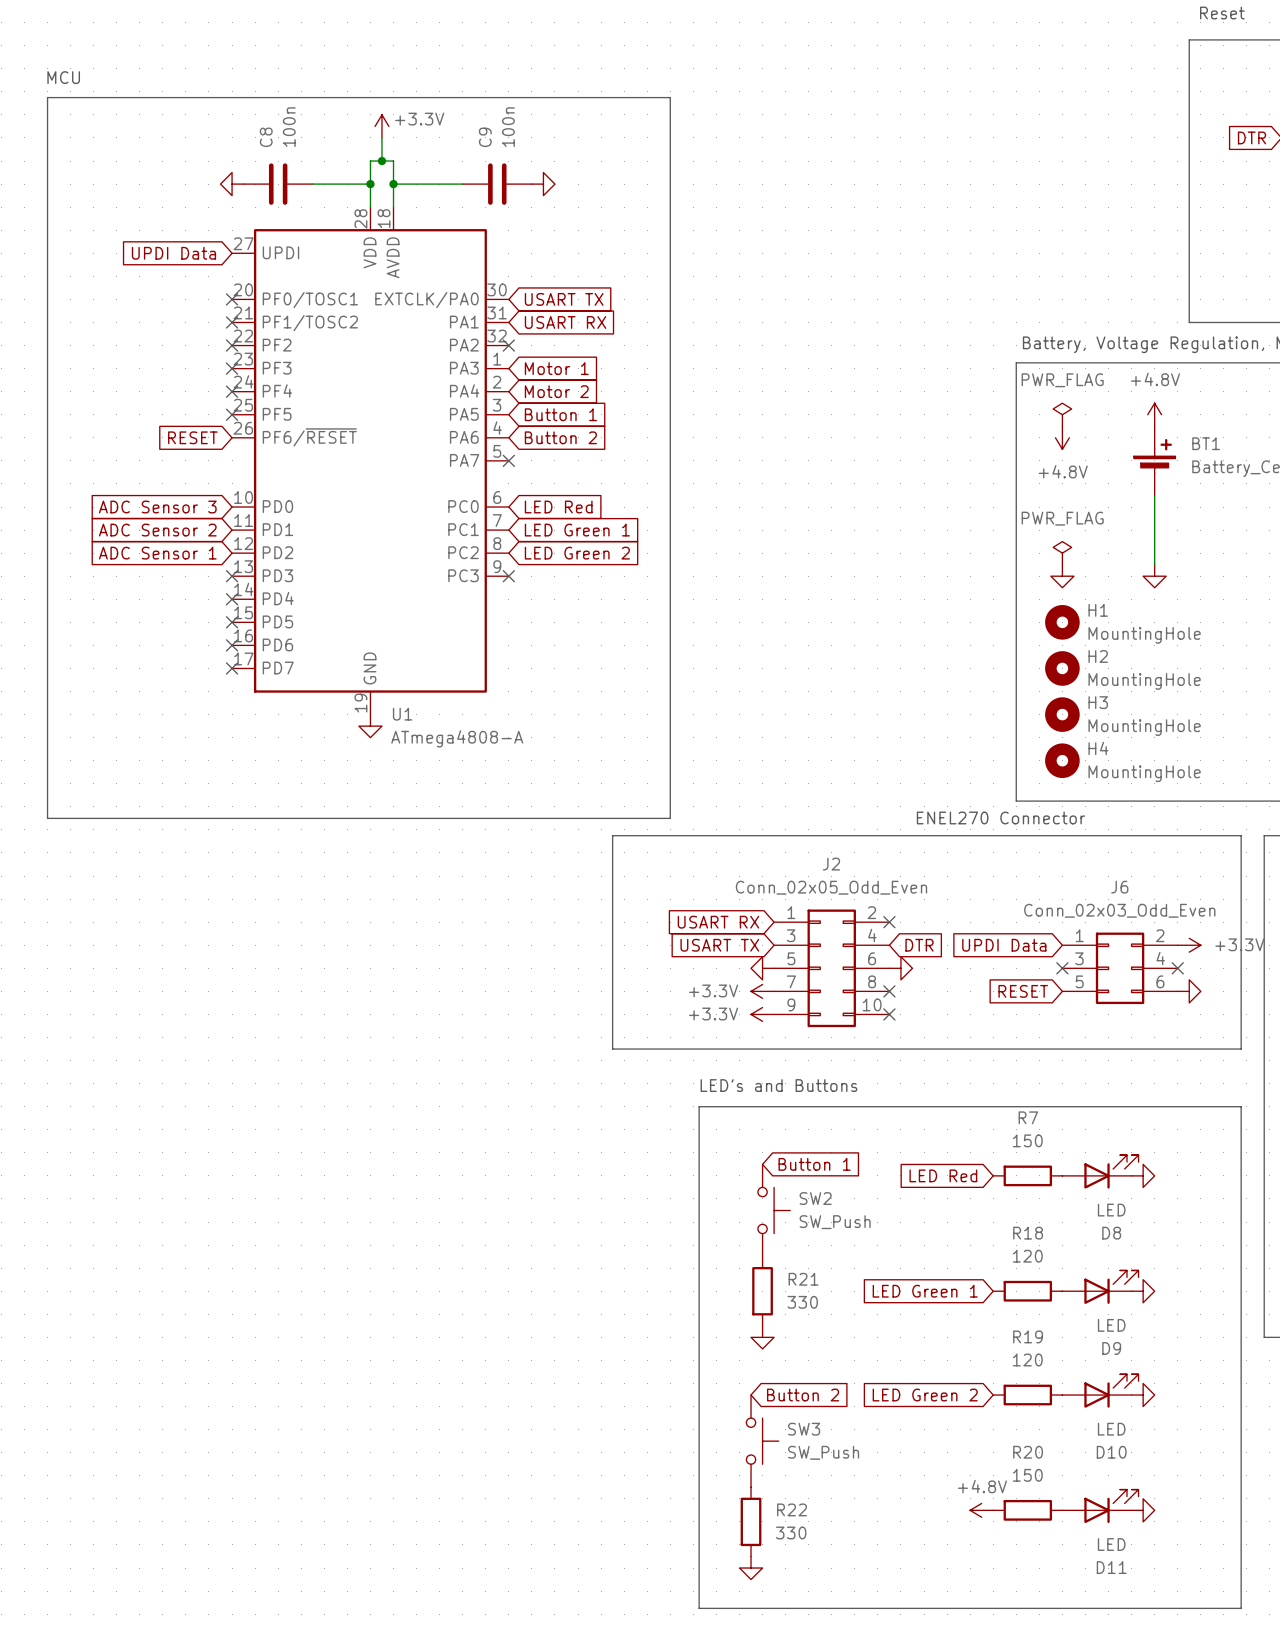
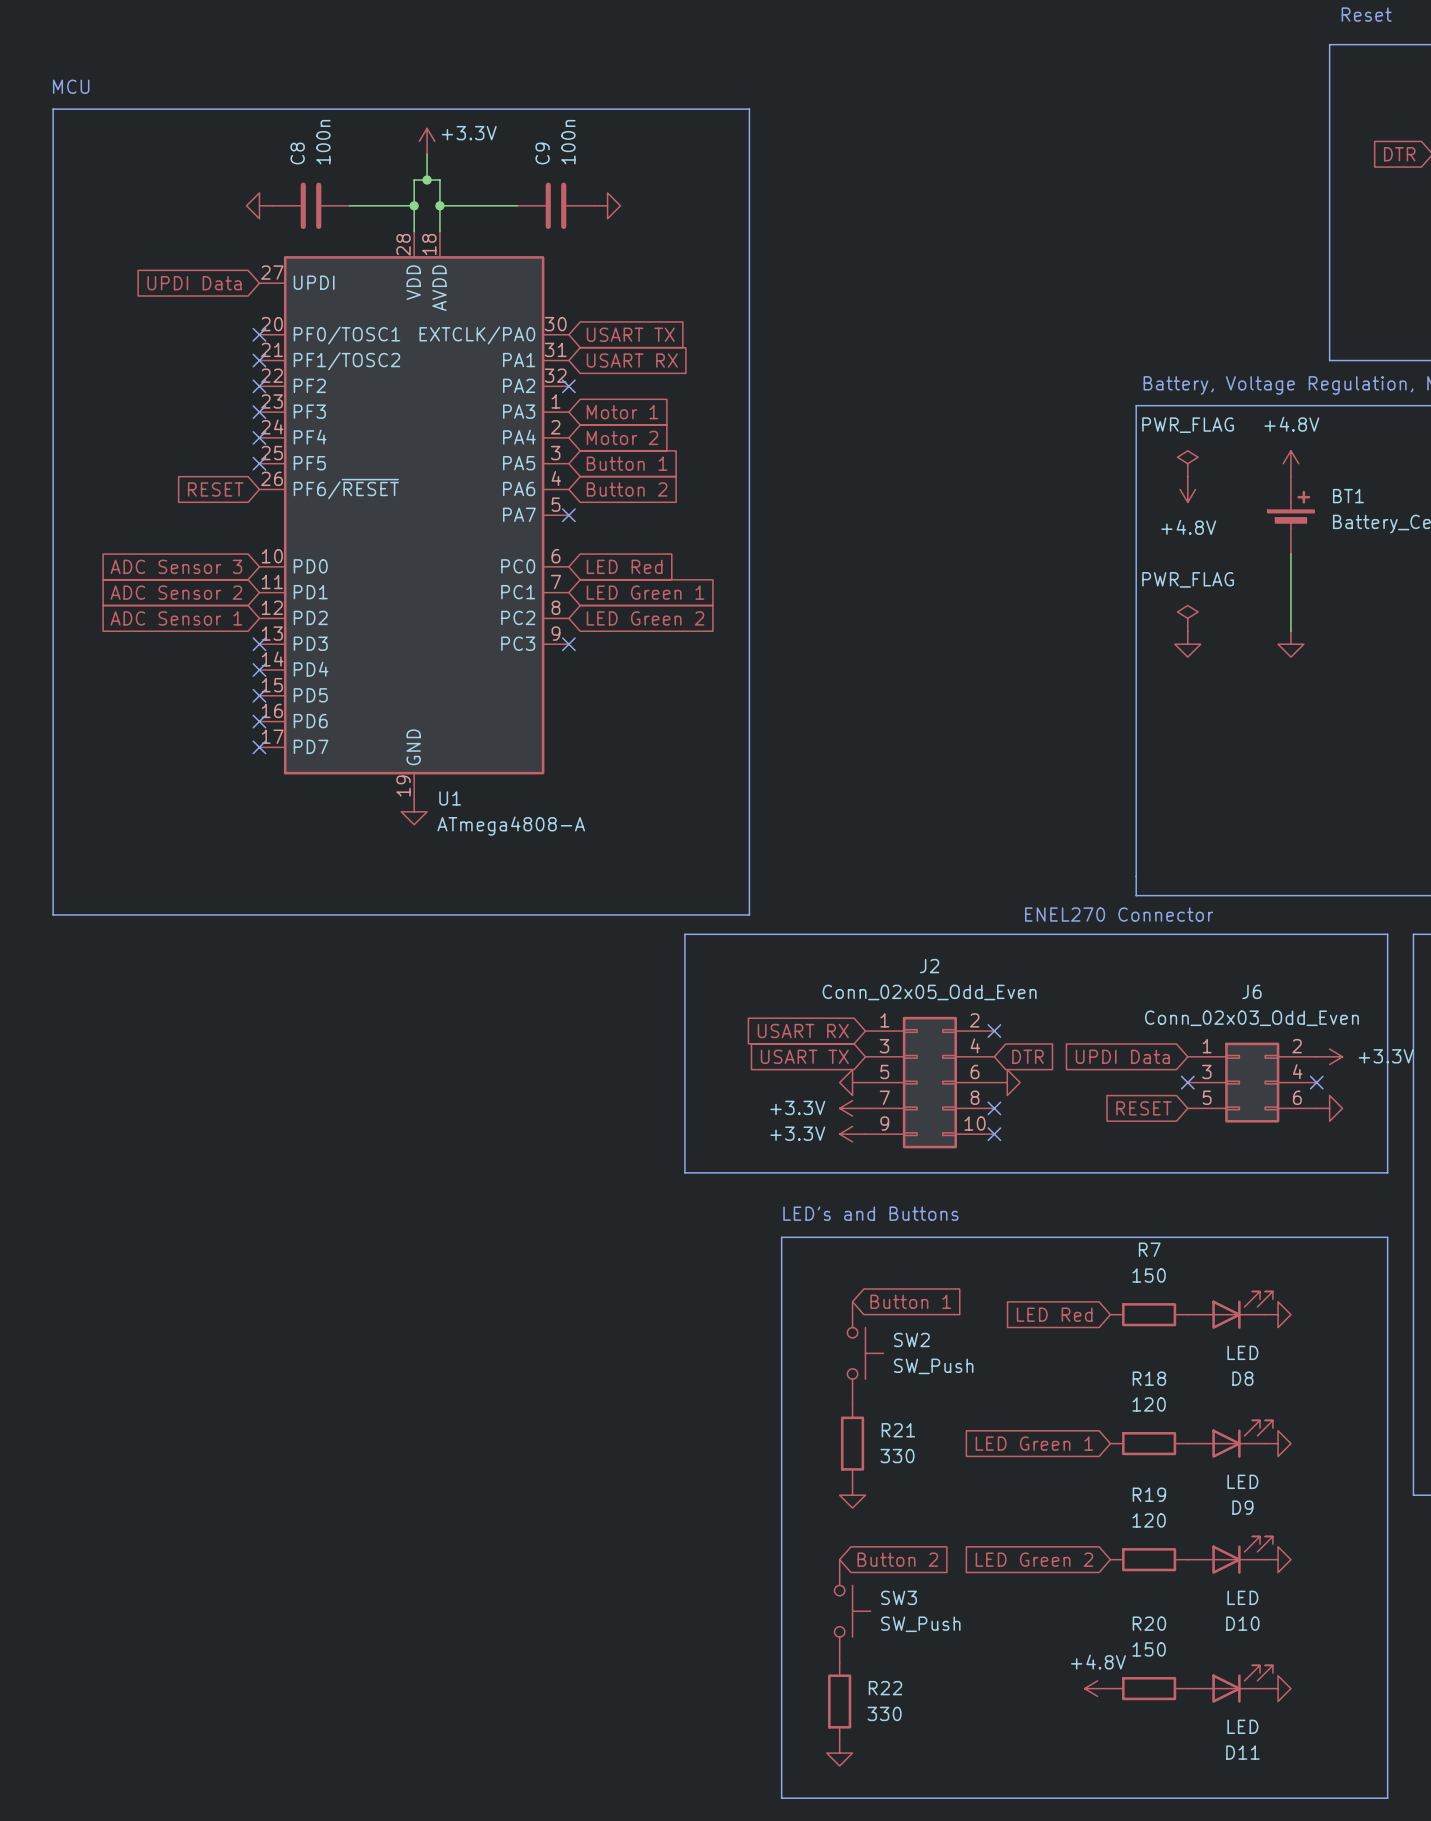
H1: MountingHole (1062, 622) -> none
H2: MountingHole (1062, 668) -> none
H3: MountingHole (1062, 714) -> none
H4: MountingHole (1062, 760) -> none

